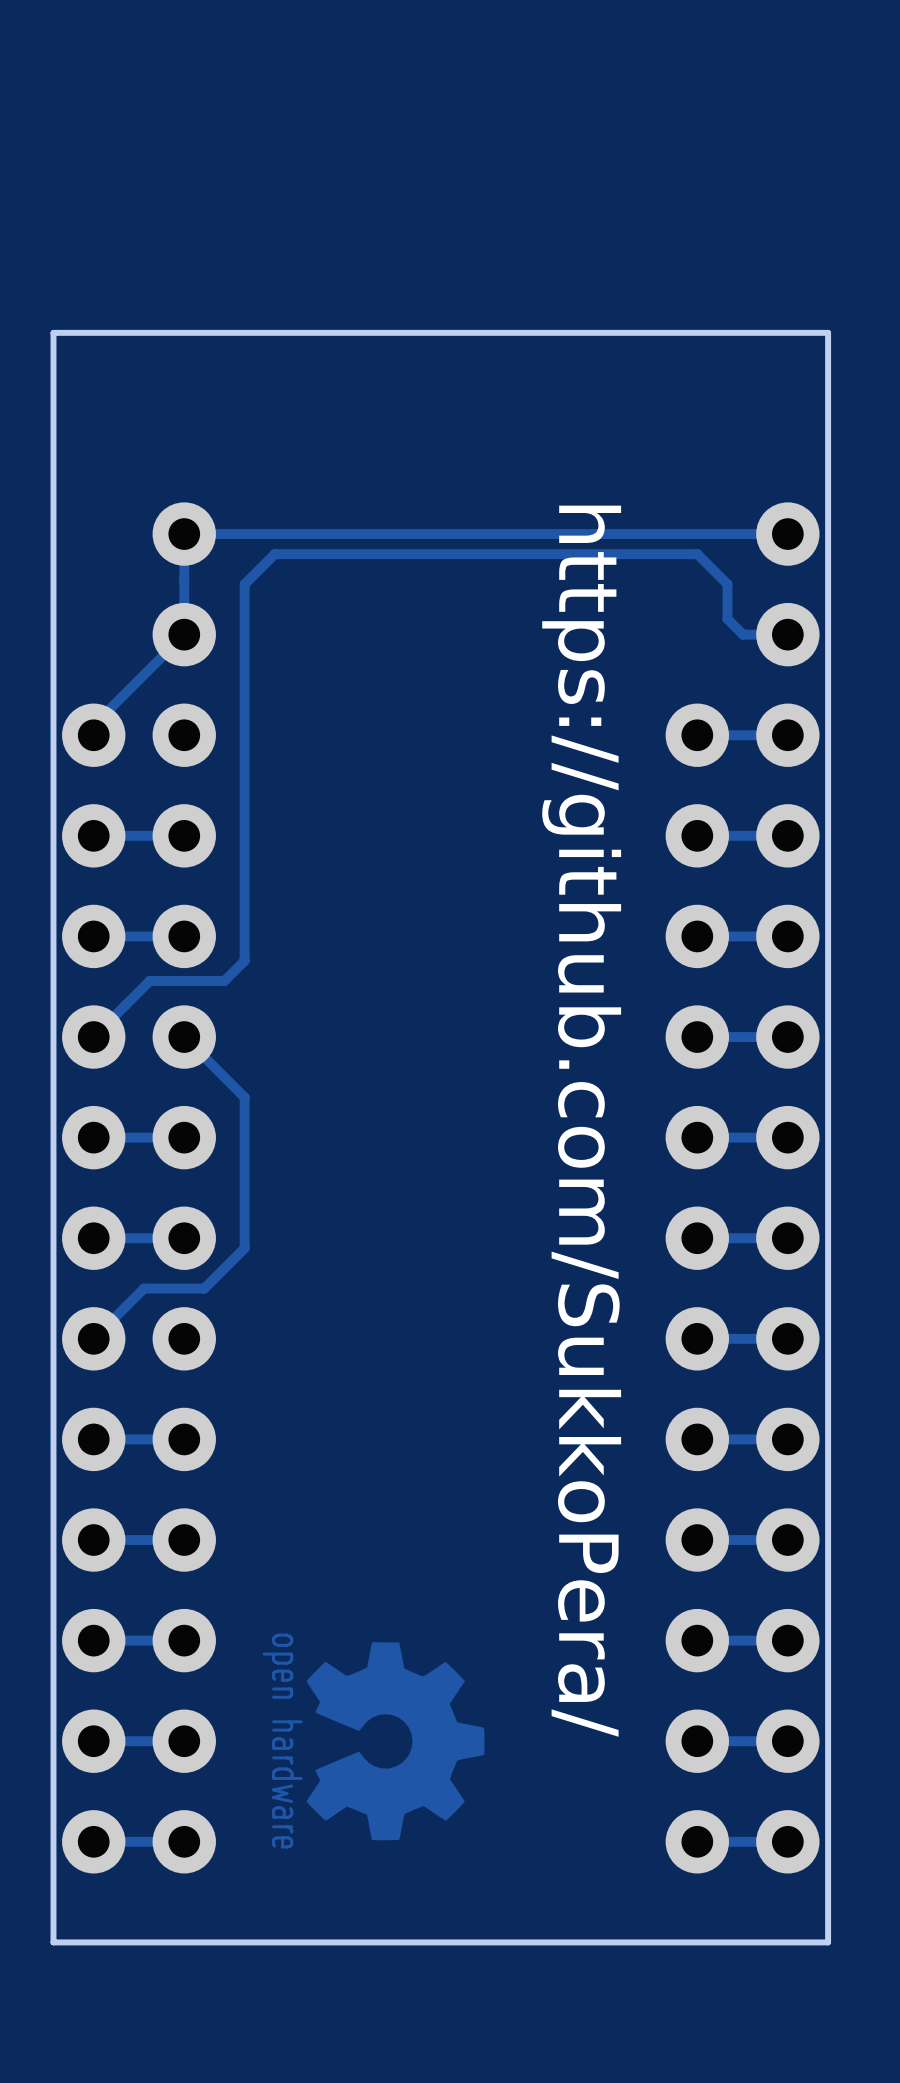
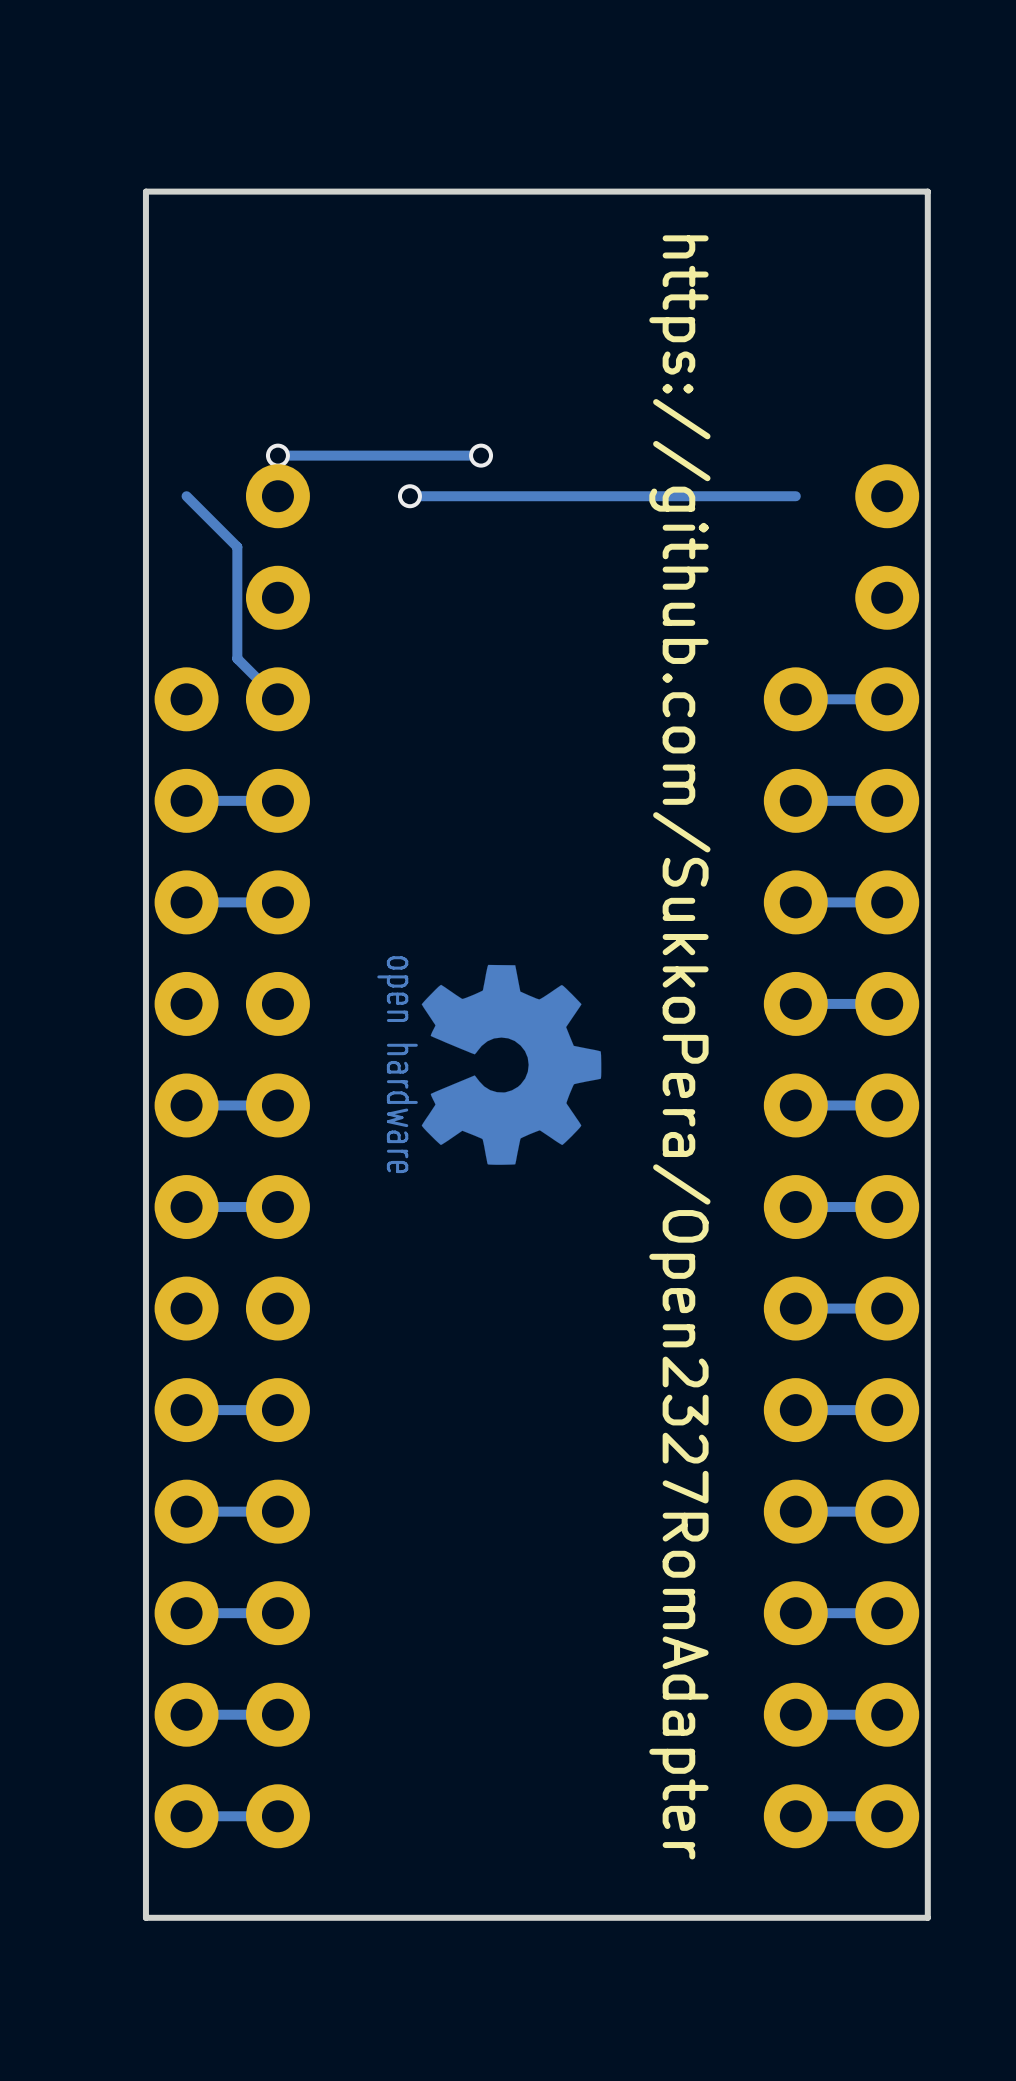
board edge: (828, 332) (53, 332) -> (927, 293) (927, 191) (145, 191) (145, 293)
via: none -> (277, 455)
track: none -> (481, 455) (277, 455)
via: none -> (481, 455)
track: none -> (186, 496) (237, 547) (237, 658) (277, 699)
track: (315, 534) (184, 534) (184, 634) (93, 725) (93, 735) -> none
via: none -> (409, 496)
track: (787, 534) (697, 534) -> none
track: (787, 634) (743, 634) (727, 619) (727, 584) (697, 554) (274, 554) (244, 584) (244, 960) (224, 981) (149, 981) (93, 1037) -> none
track: (184, 1037) (244, 1097) (244, 1248) (204, 1288) (144, 1288) (93, 1338) -> none
text: https://github.com/SukkoPera/ (581, 1121) -> https://github.com/SukkoPera/Open2327RomAdapter (679, 1047)
drawing position: (373, 1741) -> (489, 1064)

